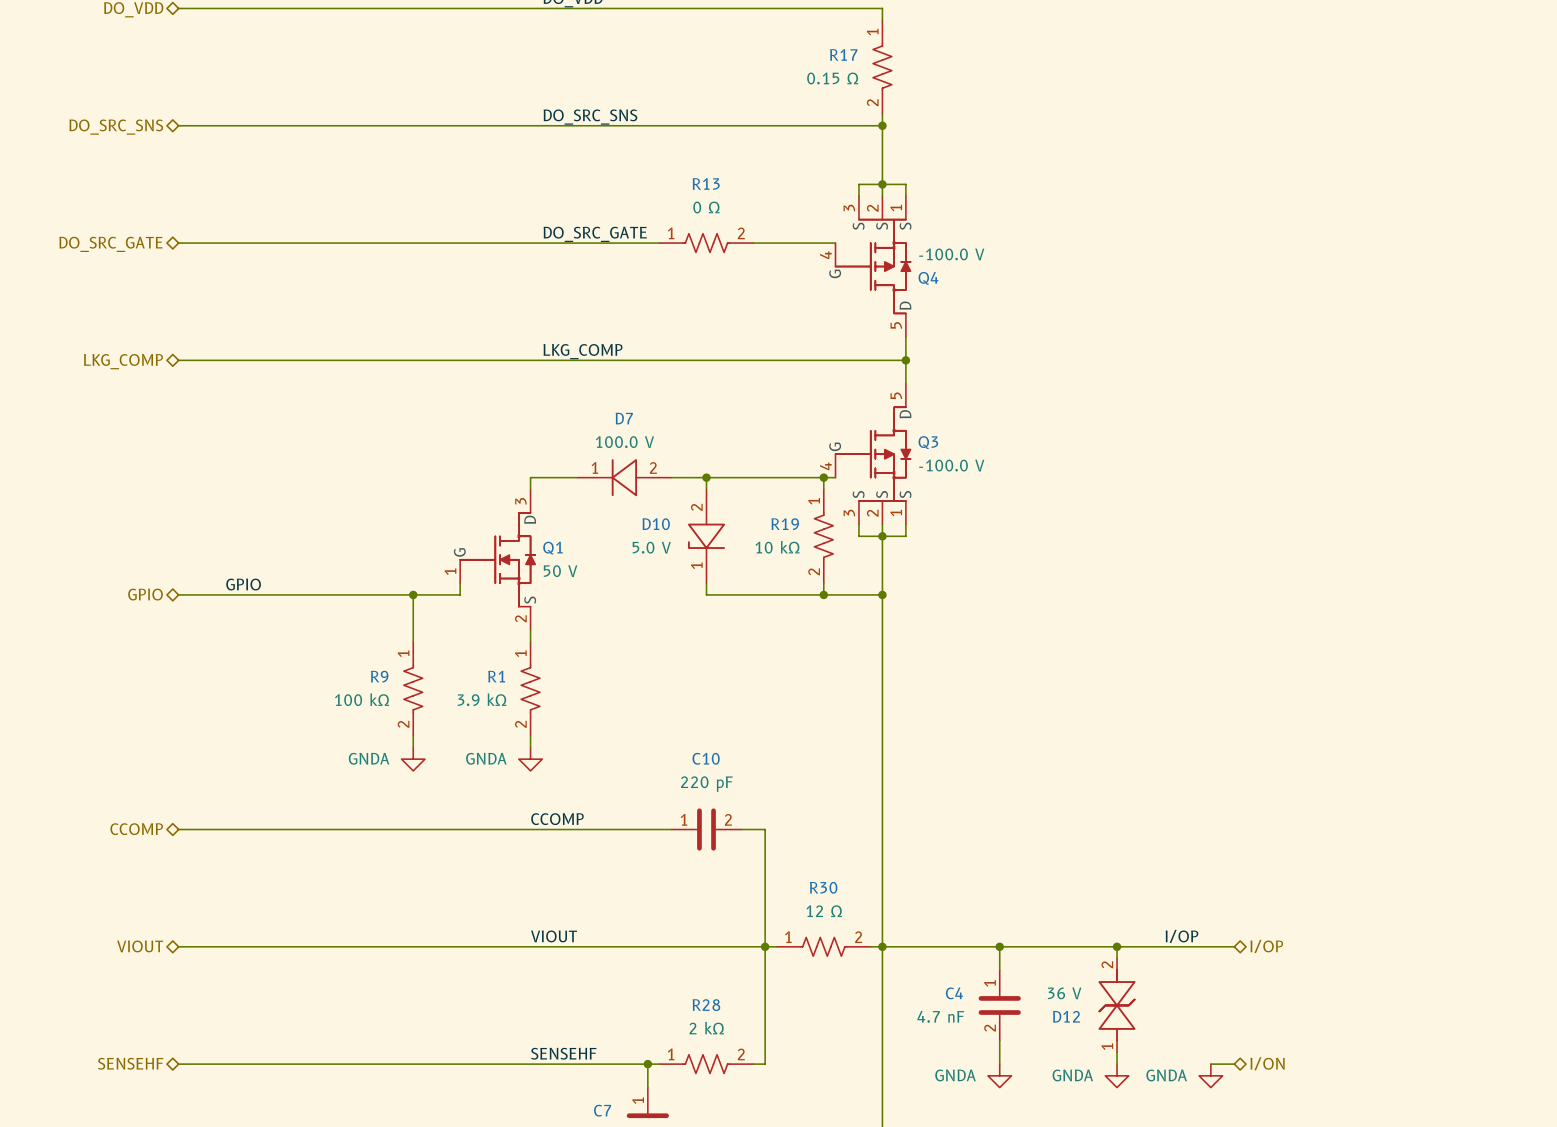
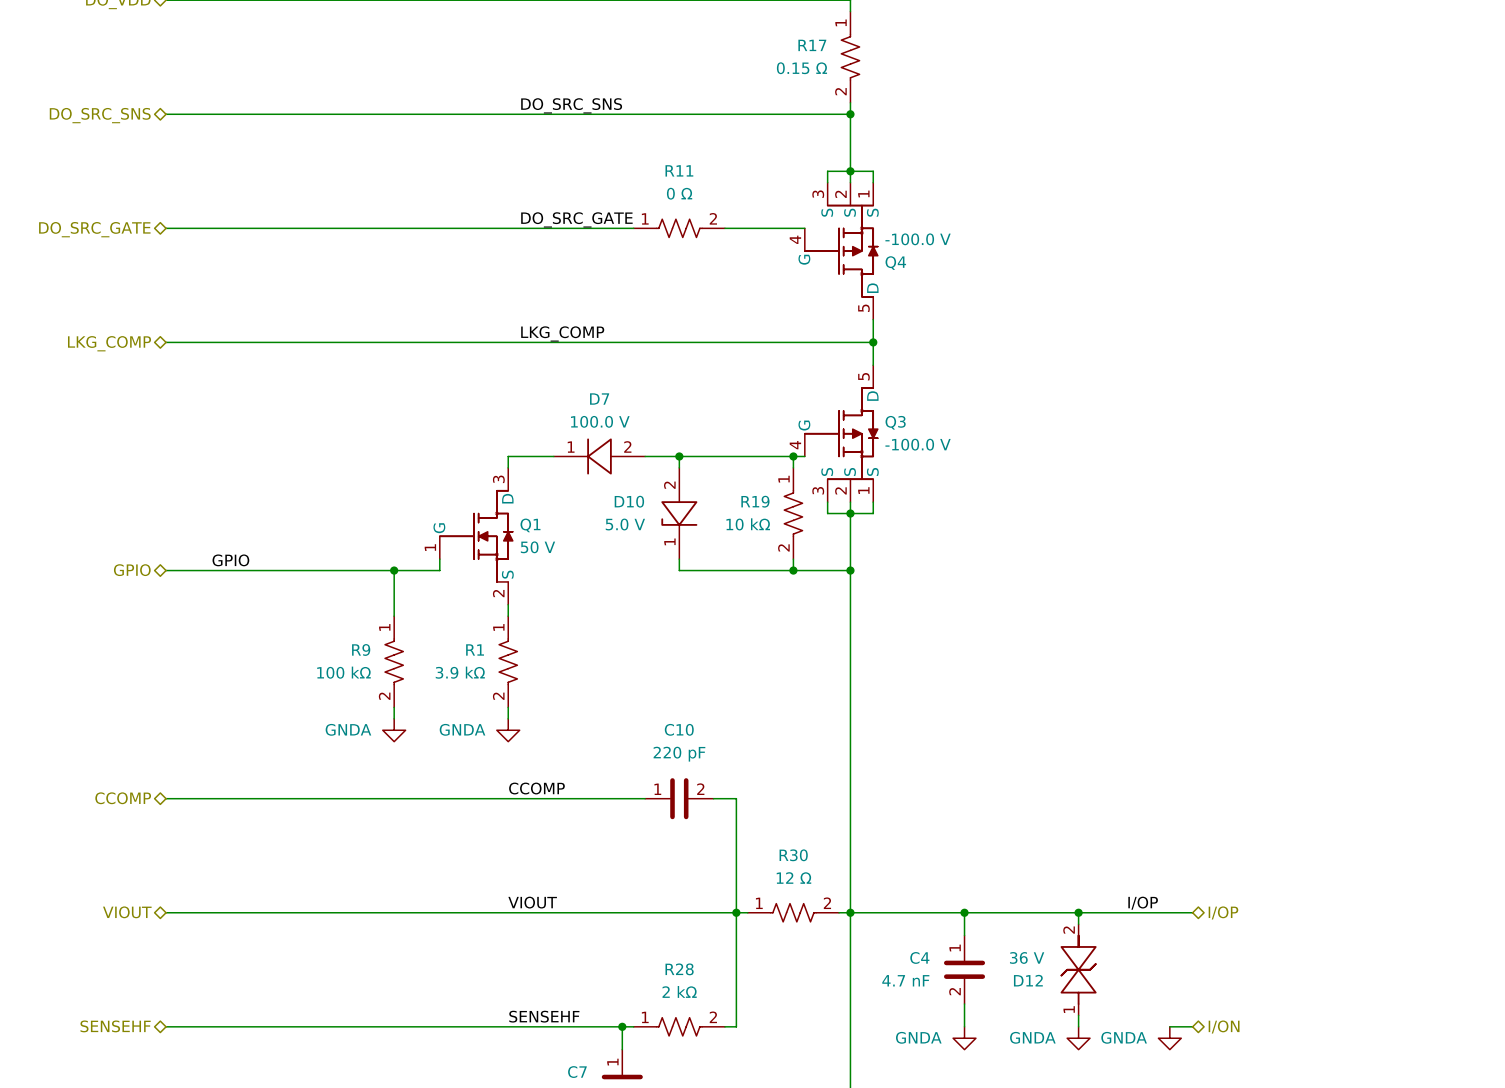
R13 name: R13 (706, 183) -> R11 (679, 170)

